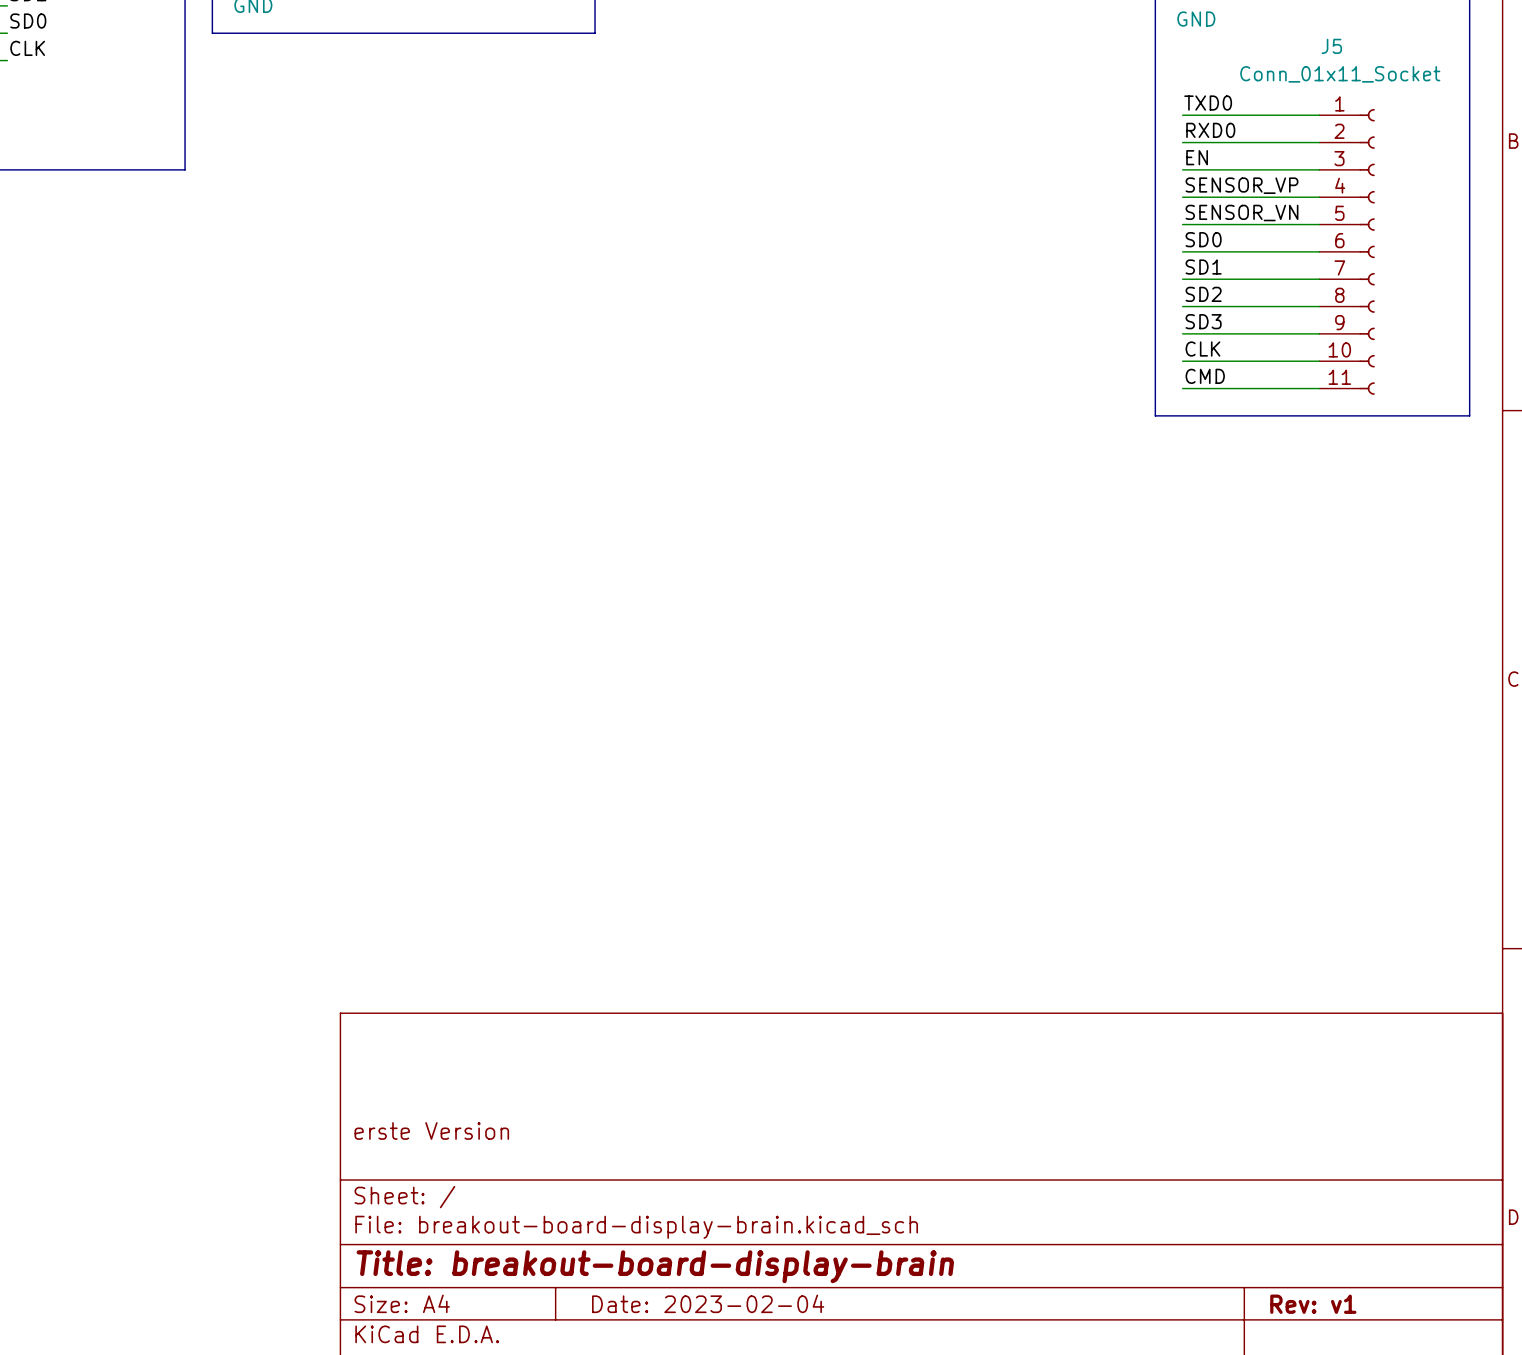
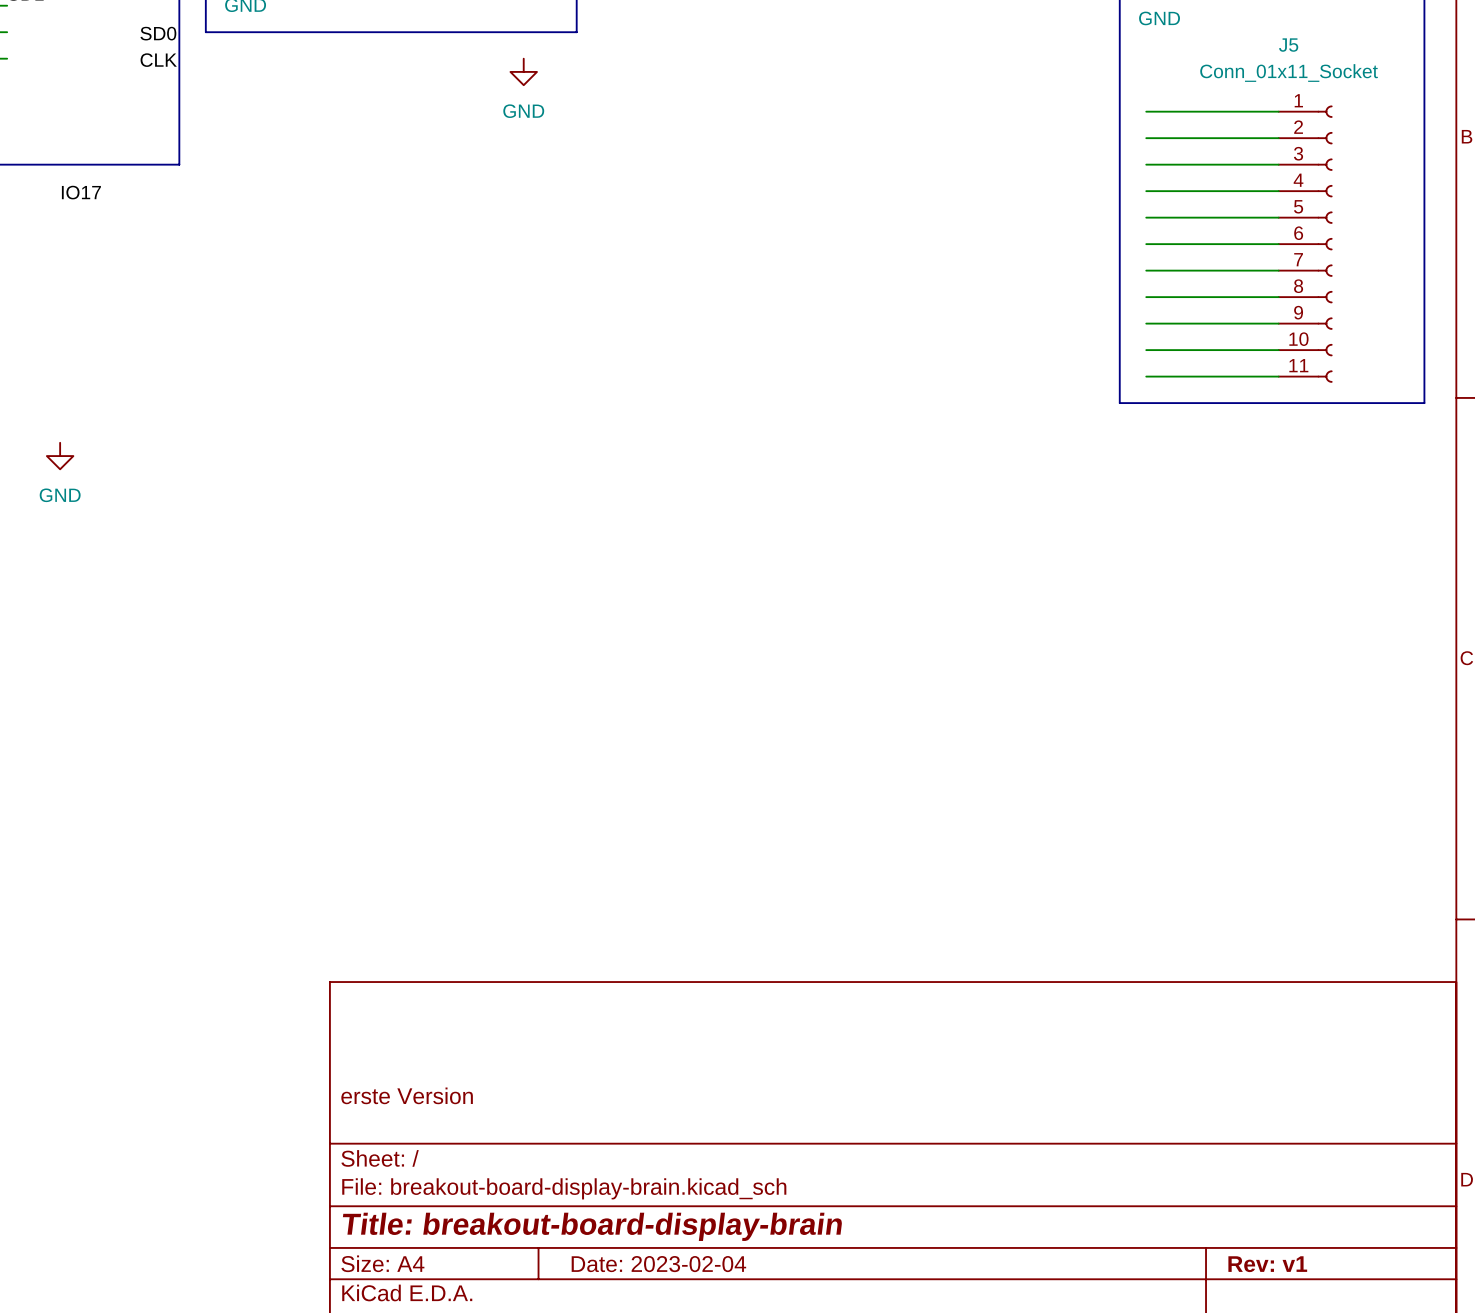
label position: SD0 (28, 21) -> SD0 (158, 33)
label position: CLK (27, 48) -> CLK (158, 60)
power symbol: none -> GND (523, 71)
label: TXD0 (1208, 103) -> none
label: RXD0 (1210, 130) -> none
label: EN (1197, 157) -> none
label: SENSOR_VP (1241, 185) -> none
label: none -> IO17 (81, 192)
label: SENSOR_VN (1241, 213) -> none
label: SD0 (1203, 239) -> none
label: SD1 (1203, 267) -> none
label: SD2 (1203, 294) -> none
label: SD3 (1203, 321) -> none
label: CLK (1202, 349) -> none
label: CMD (1205, 376) -> none
power symbol: none -> GND (60, 456)

